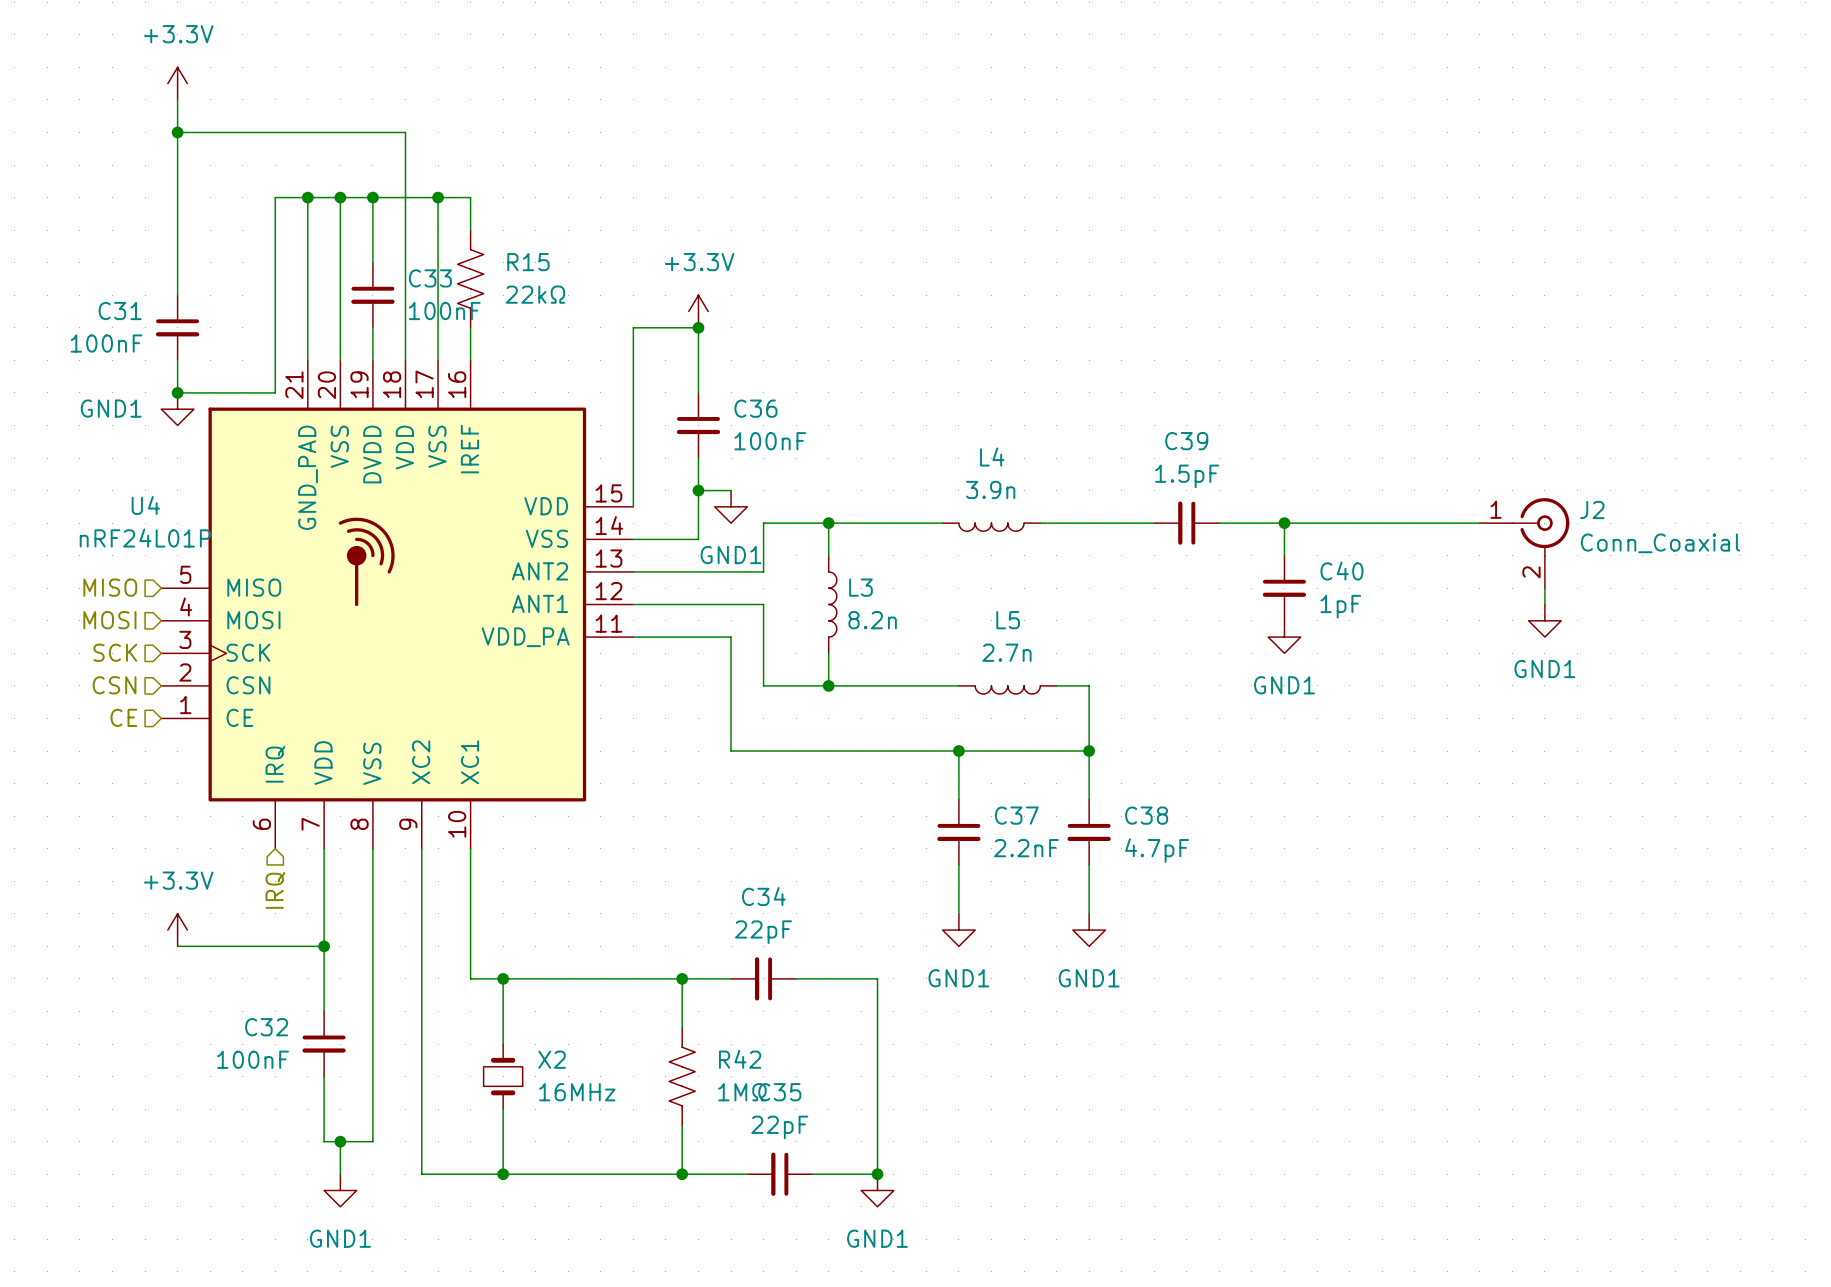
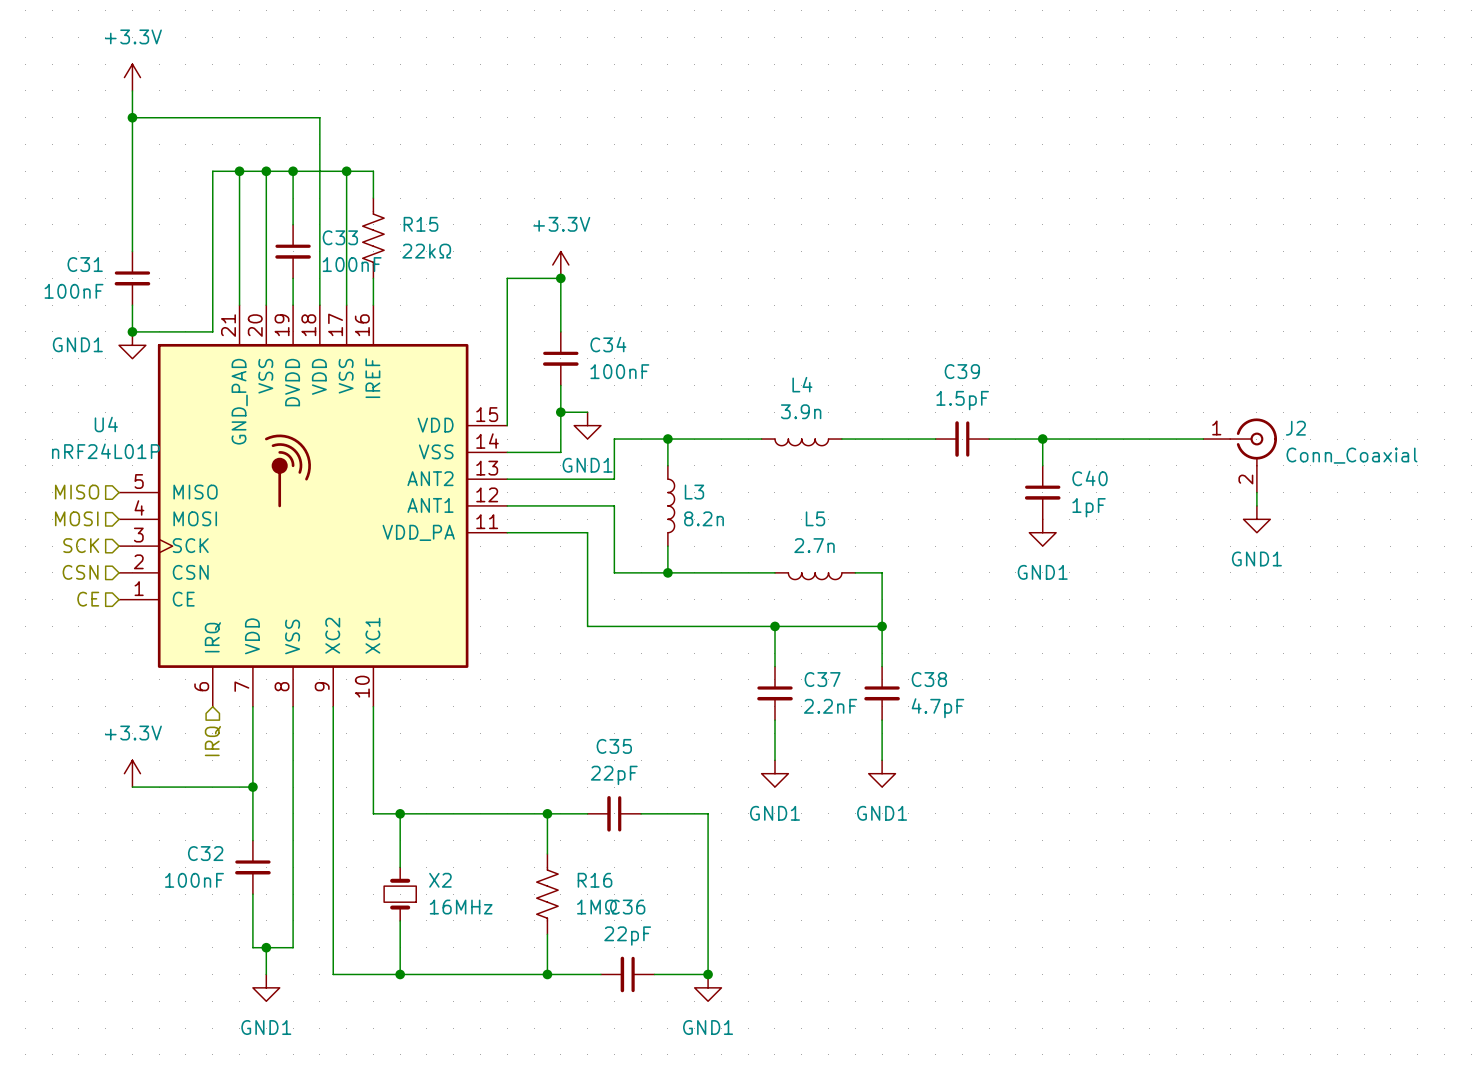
C36 name: C36 (755, 408) -> C34 (608, 344)
C34 name: C34 (763, 896) -> C35 (614, 746)
R42 name: R42 (740, 1059) -> R16 (595, 880)
C35 name: C35 (779, 1092) -> C36 (627, 907)

